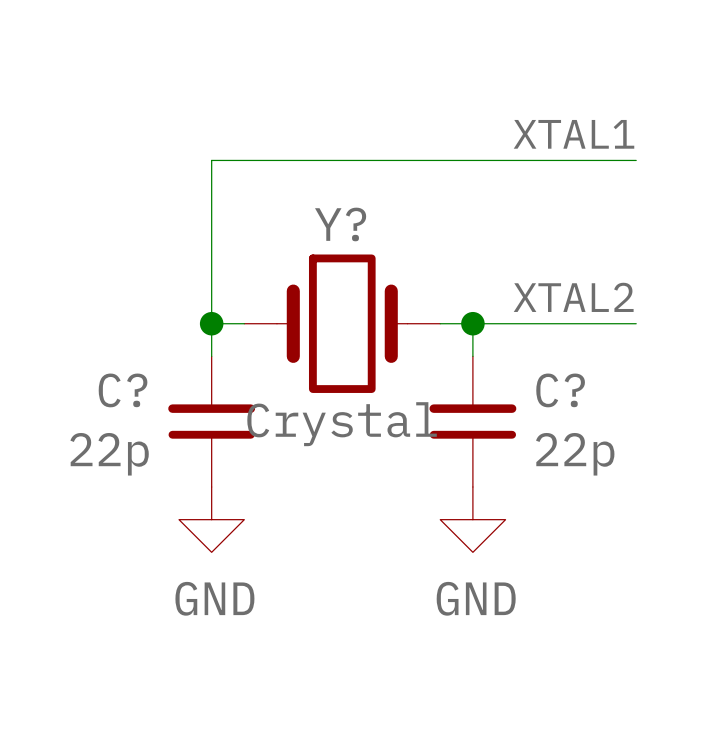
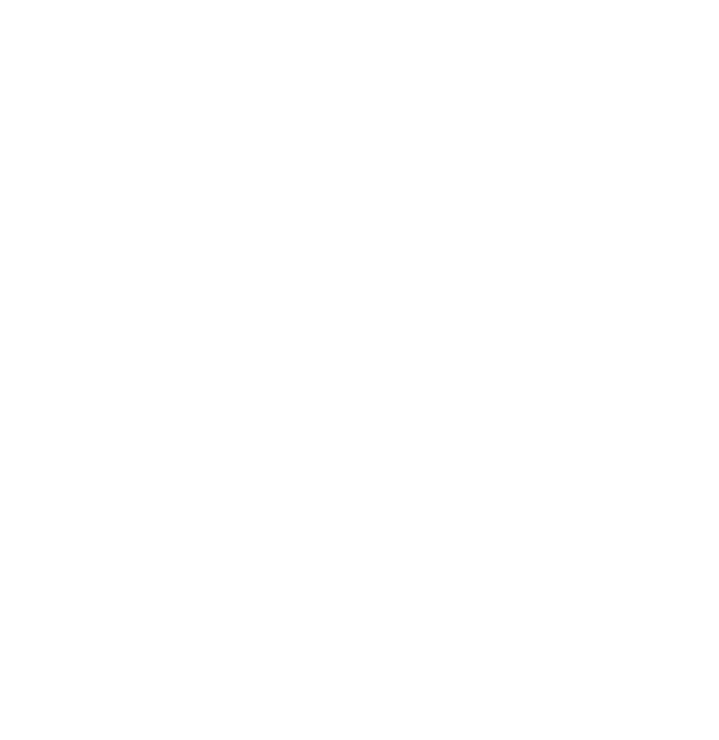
label: XTAL1 (574, 134) -> none
wire: (636, 160) (211, 160) (211, 356) -> none
label: XTAL2 (573, 297) -> none
wire: (211, 323) (244, 323) -> none
junction: (211, 323) -> none
Y?: Crystal (342, 323) -> none
wire: (440, 323) (636, 323) -> none
wire: (472, 323) (472, 356) -> none
junction: (472, 323) -> none
C?: 22p (211, 421) -> none
C?: 22p (472, 421) -> none
power symbol: GND (211, 519) -> none
power symbol: GND (472, 519) -> none

